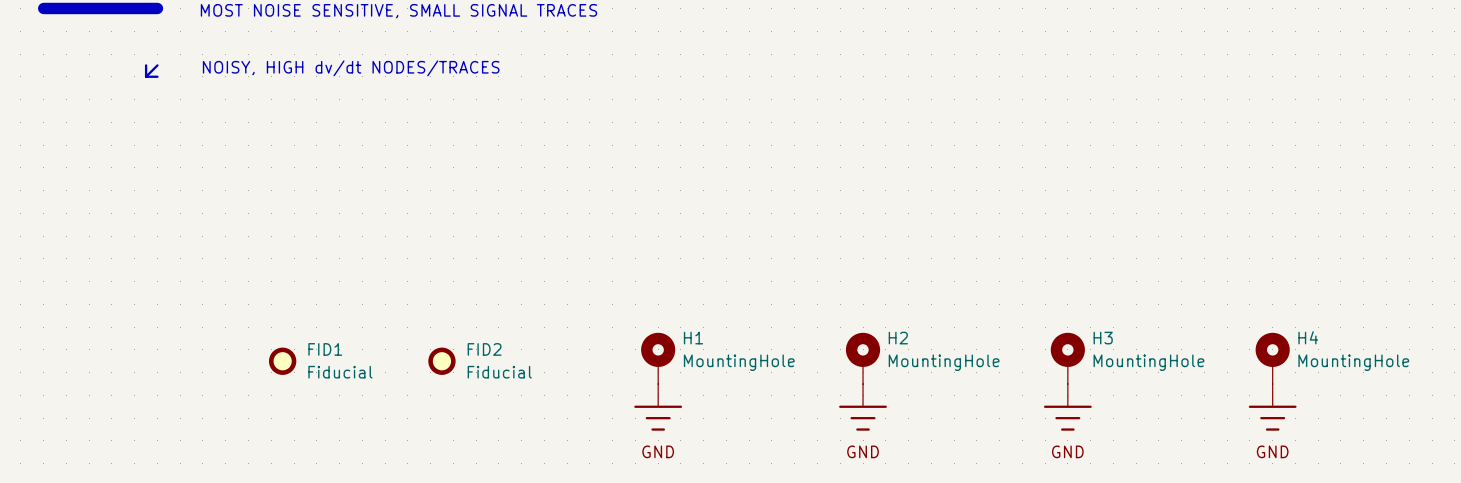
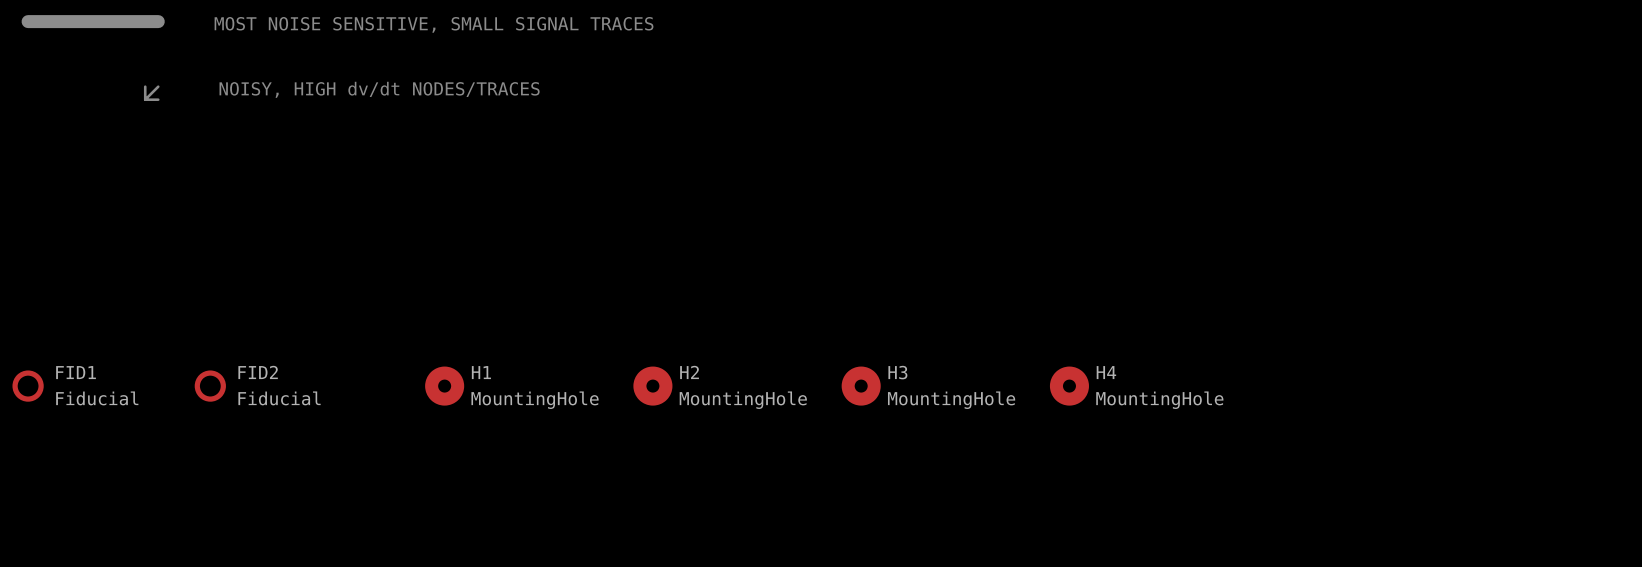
H1 symbol: [641, 332, 676, 385] -> [425, 366, 465, 406]
H2 symbol: [845, 332, 881, 385] -> [633, 366, 673, 406]
H3 symbol: [1050, 332, 1085, 385] -> [841, 366, 881, 406]
H4 symbol: [1255, 332, 1290, 385] -> [1049, 366, 1089, 406]
FID1 position: (282, 361) -> (28, 386)
FID2 position: (441, 361) -> (210, 386)
power symbol: (658, 407) -> none
power symbol: (863, 407) -> none
power symbol: (1067, 407) -> none
power symbol: (1272, 407) -> none

